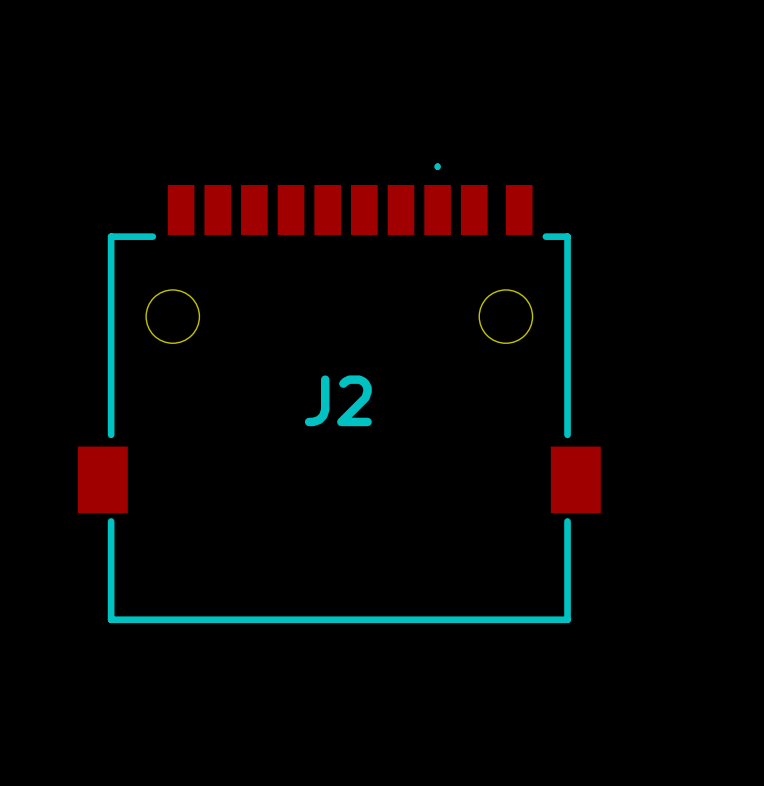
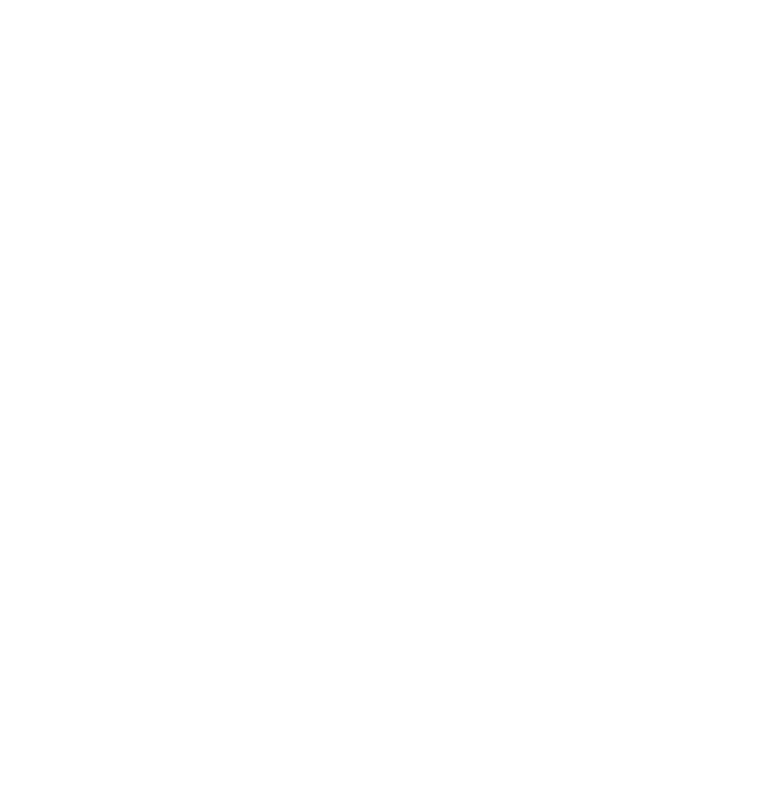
J2: (339, 393) -> none

